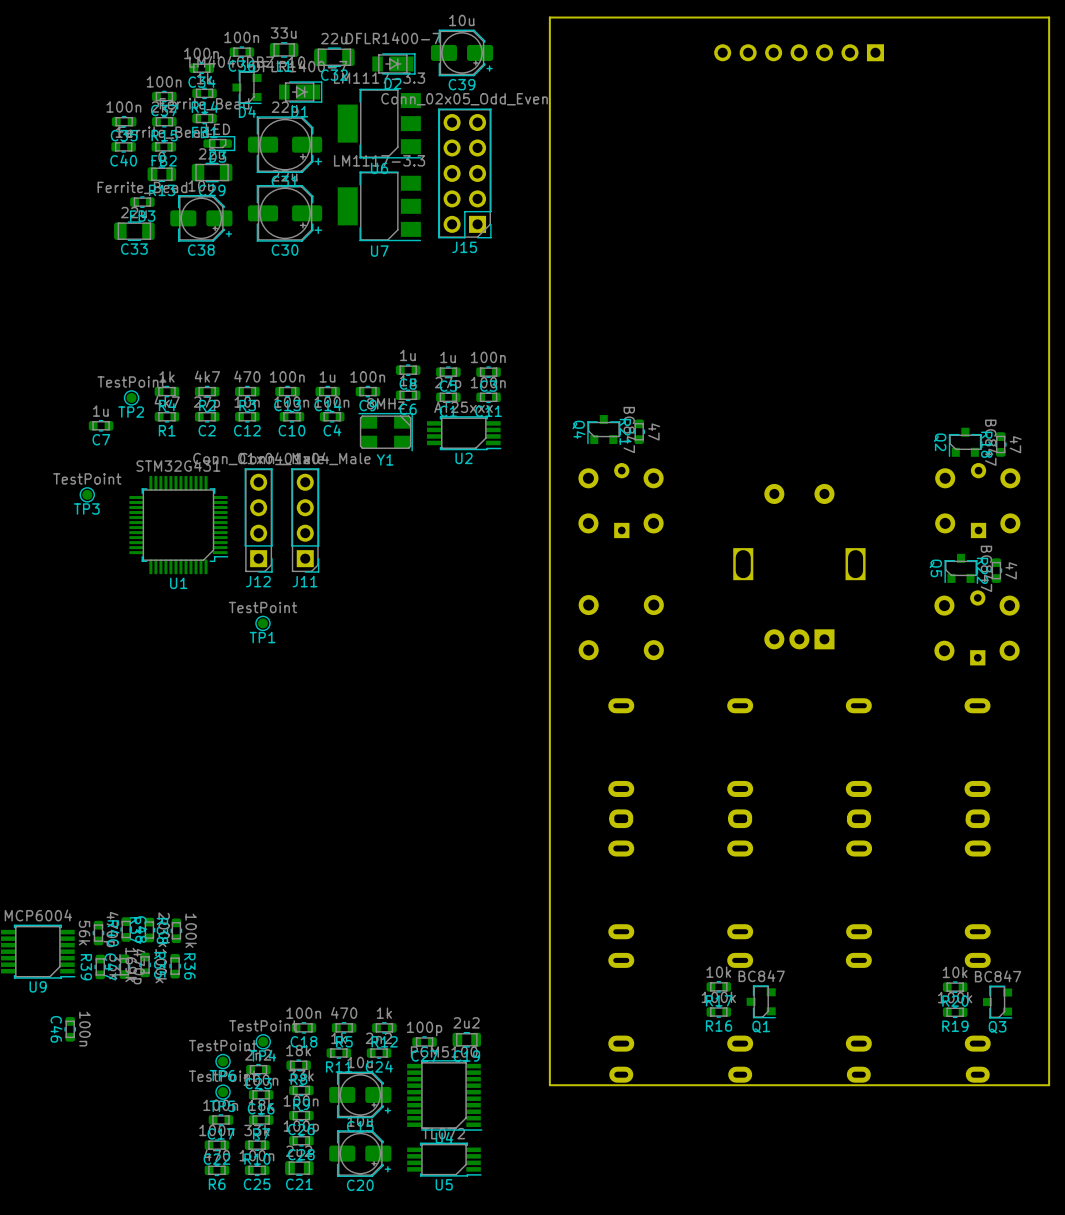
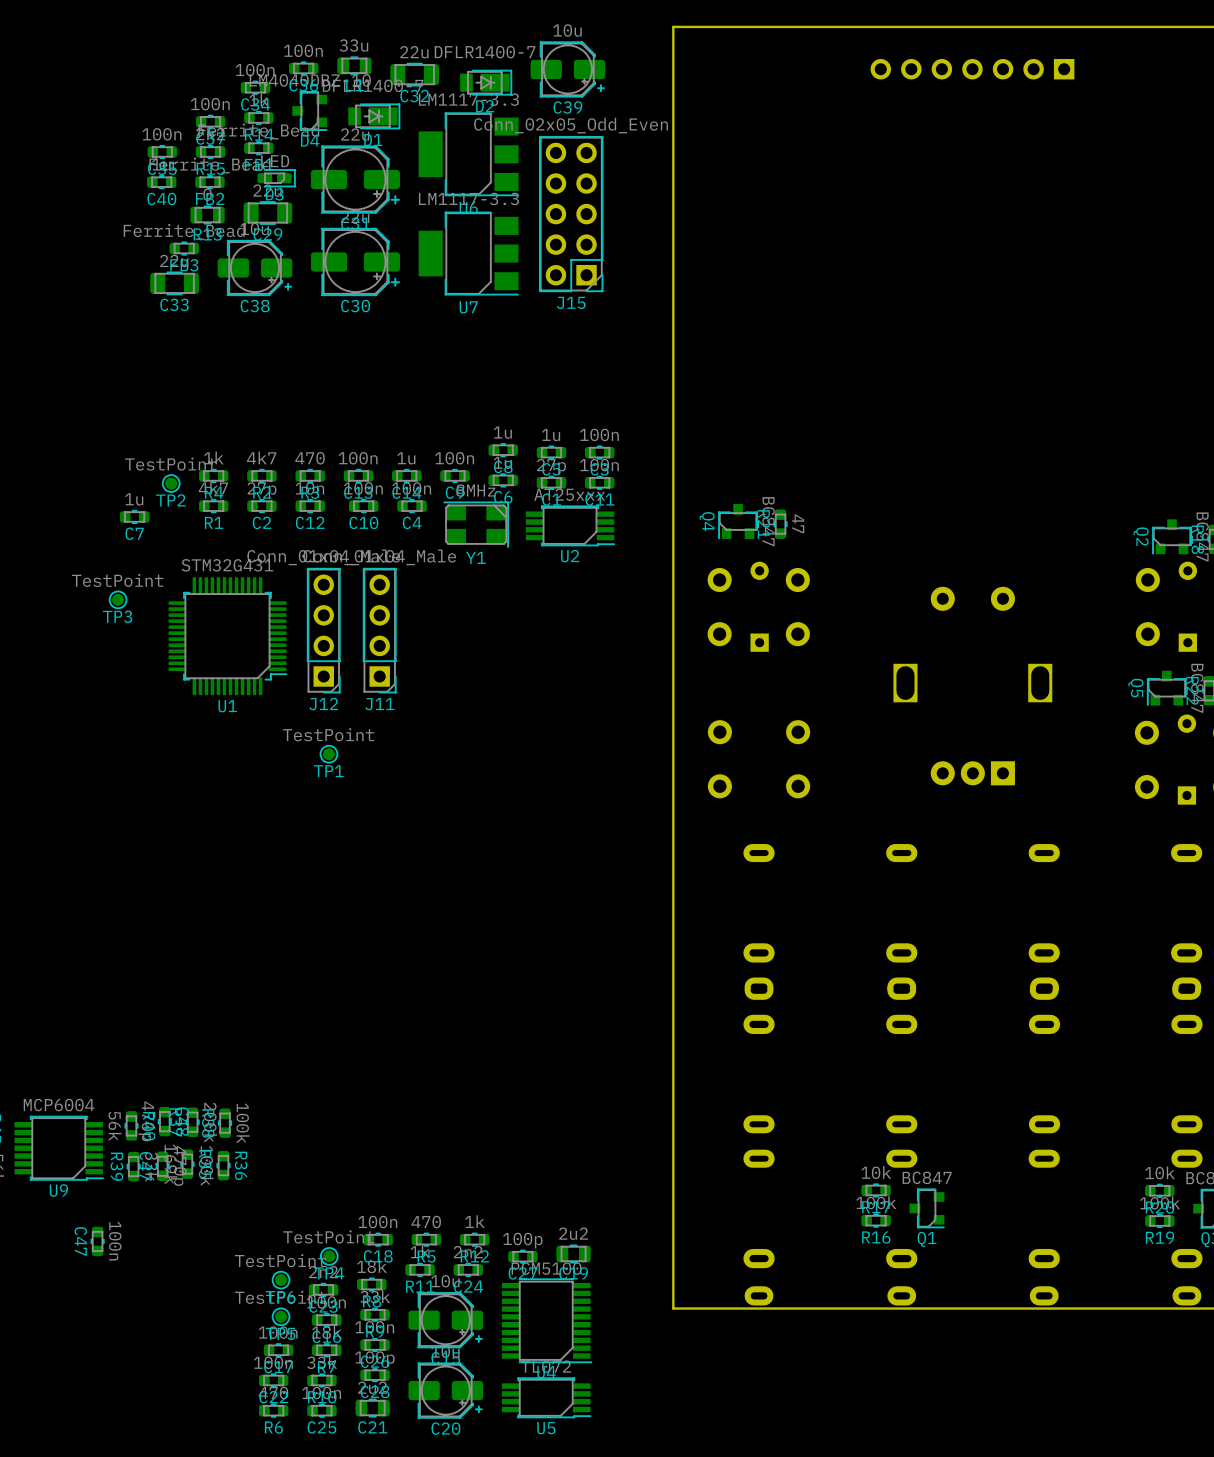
C46 name: C46 (56, 1029) -> C47 (80, 1241)

